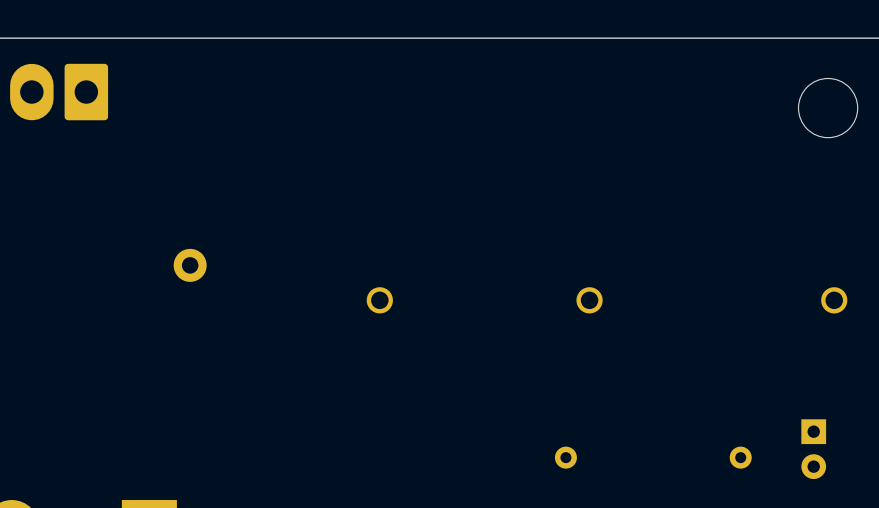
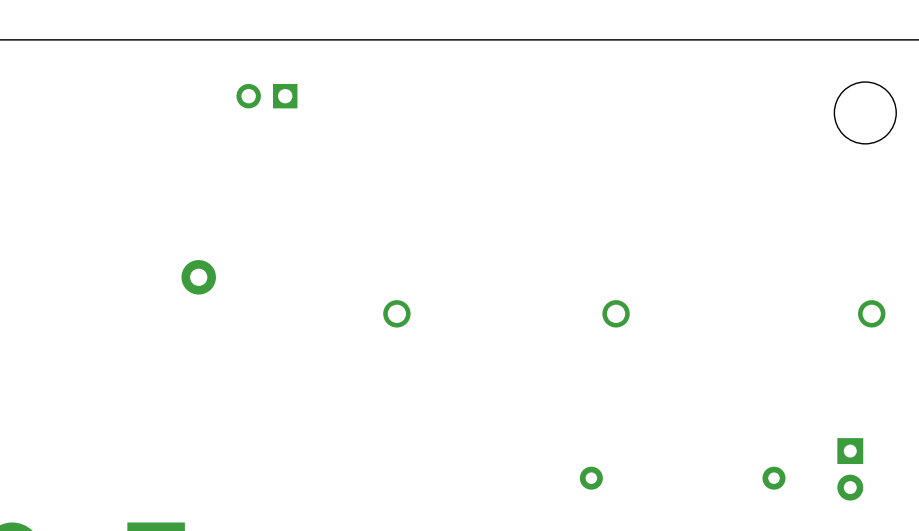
part: (59, 92) -> none
part: none -> (266, 96)

